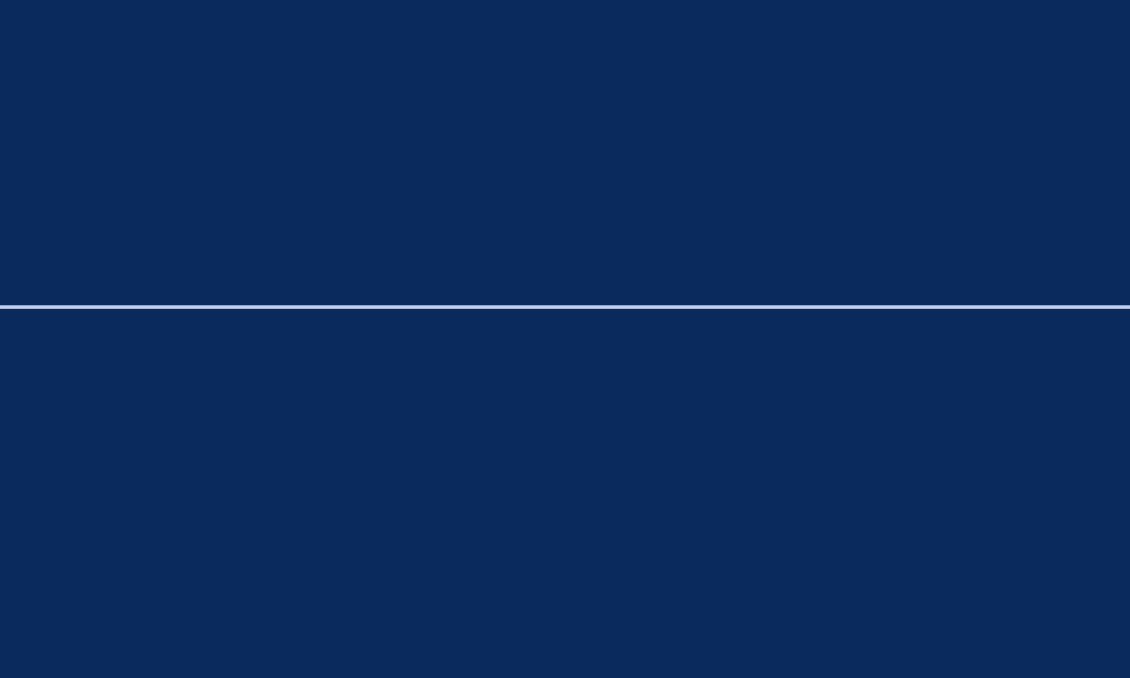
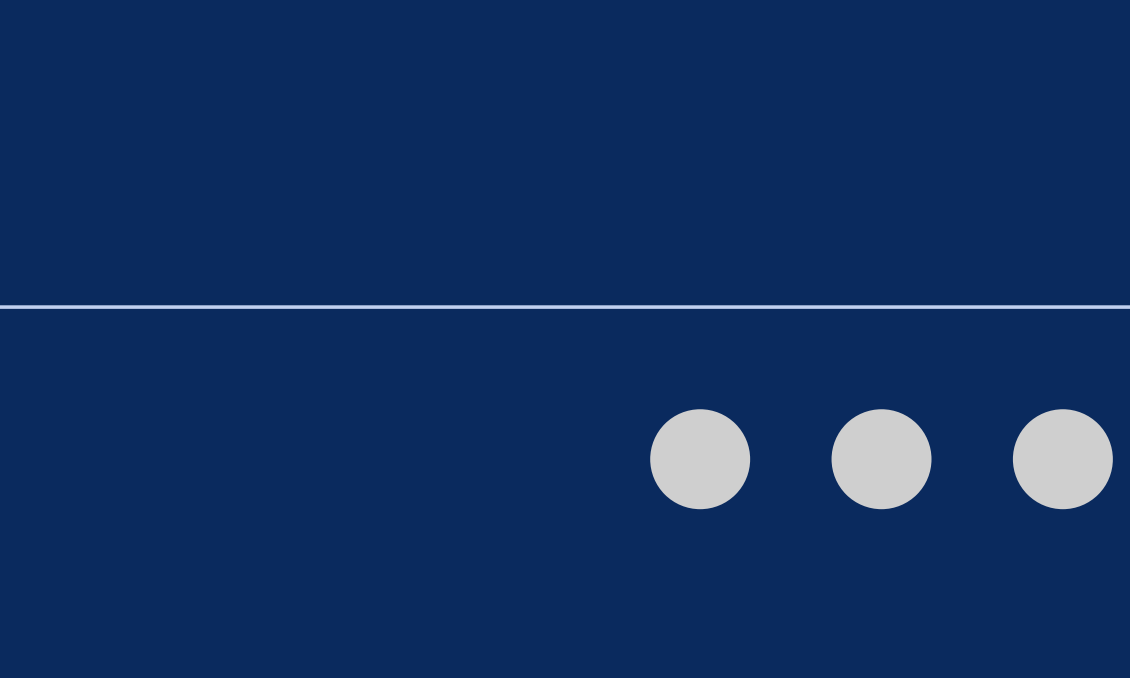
part: none -> (881, 459)

